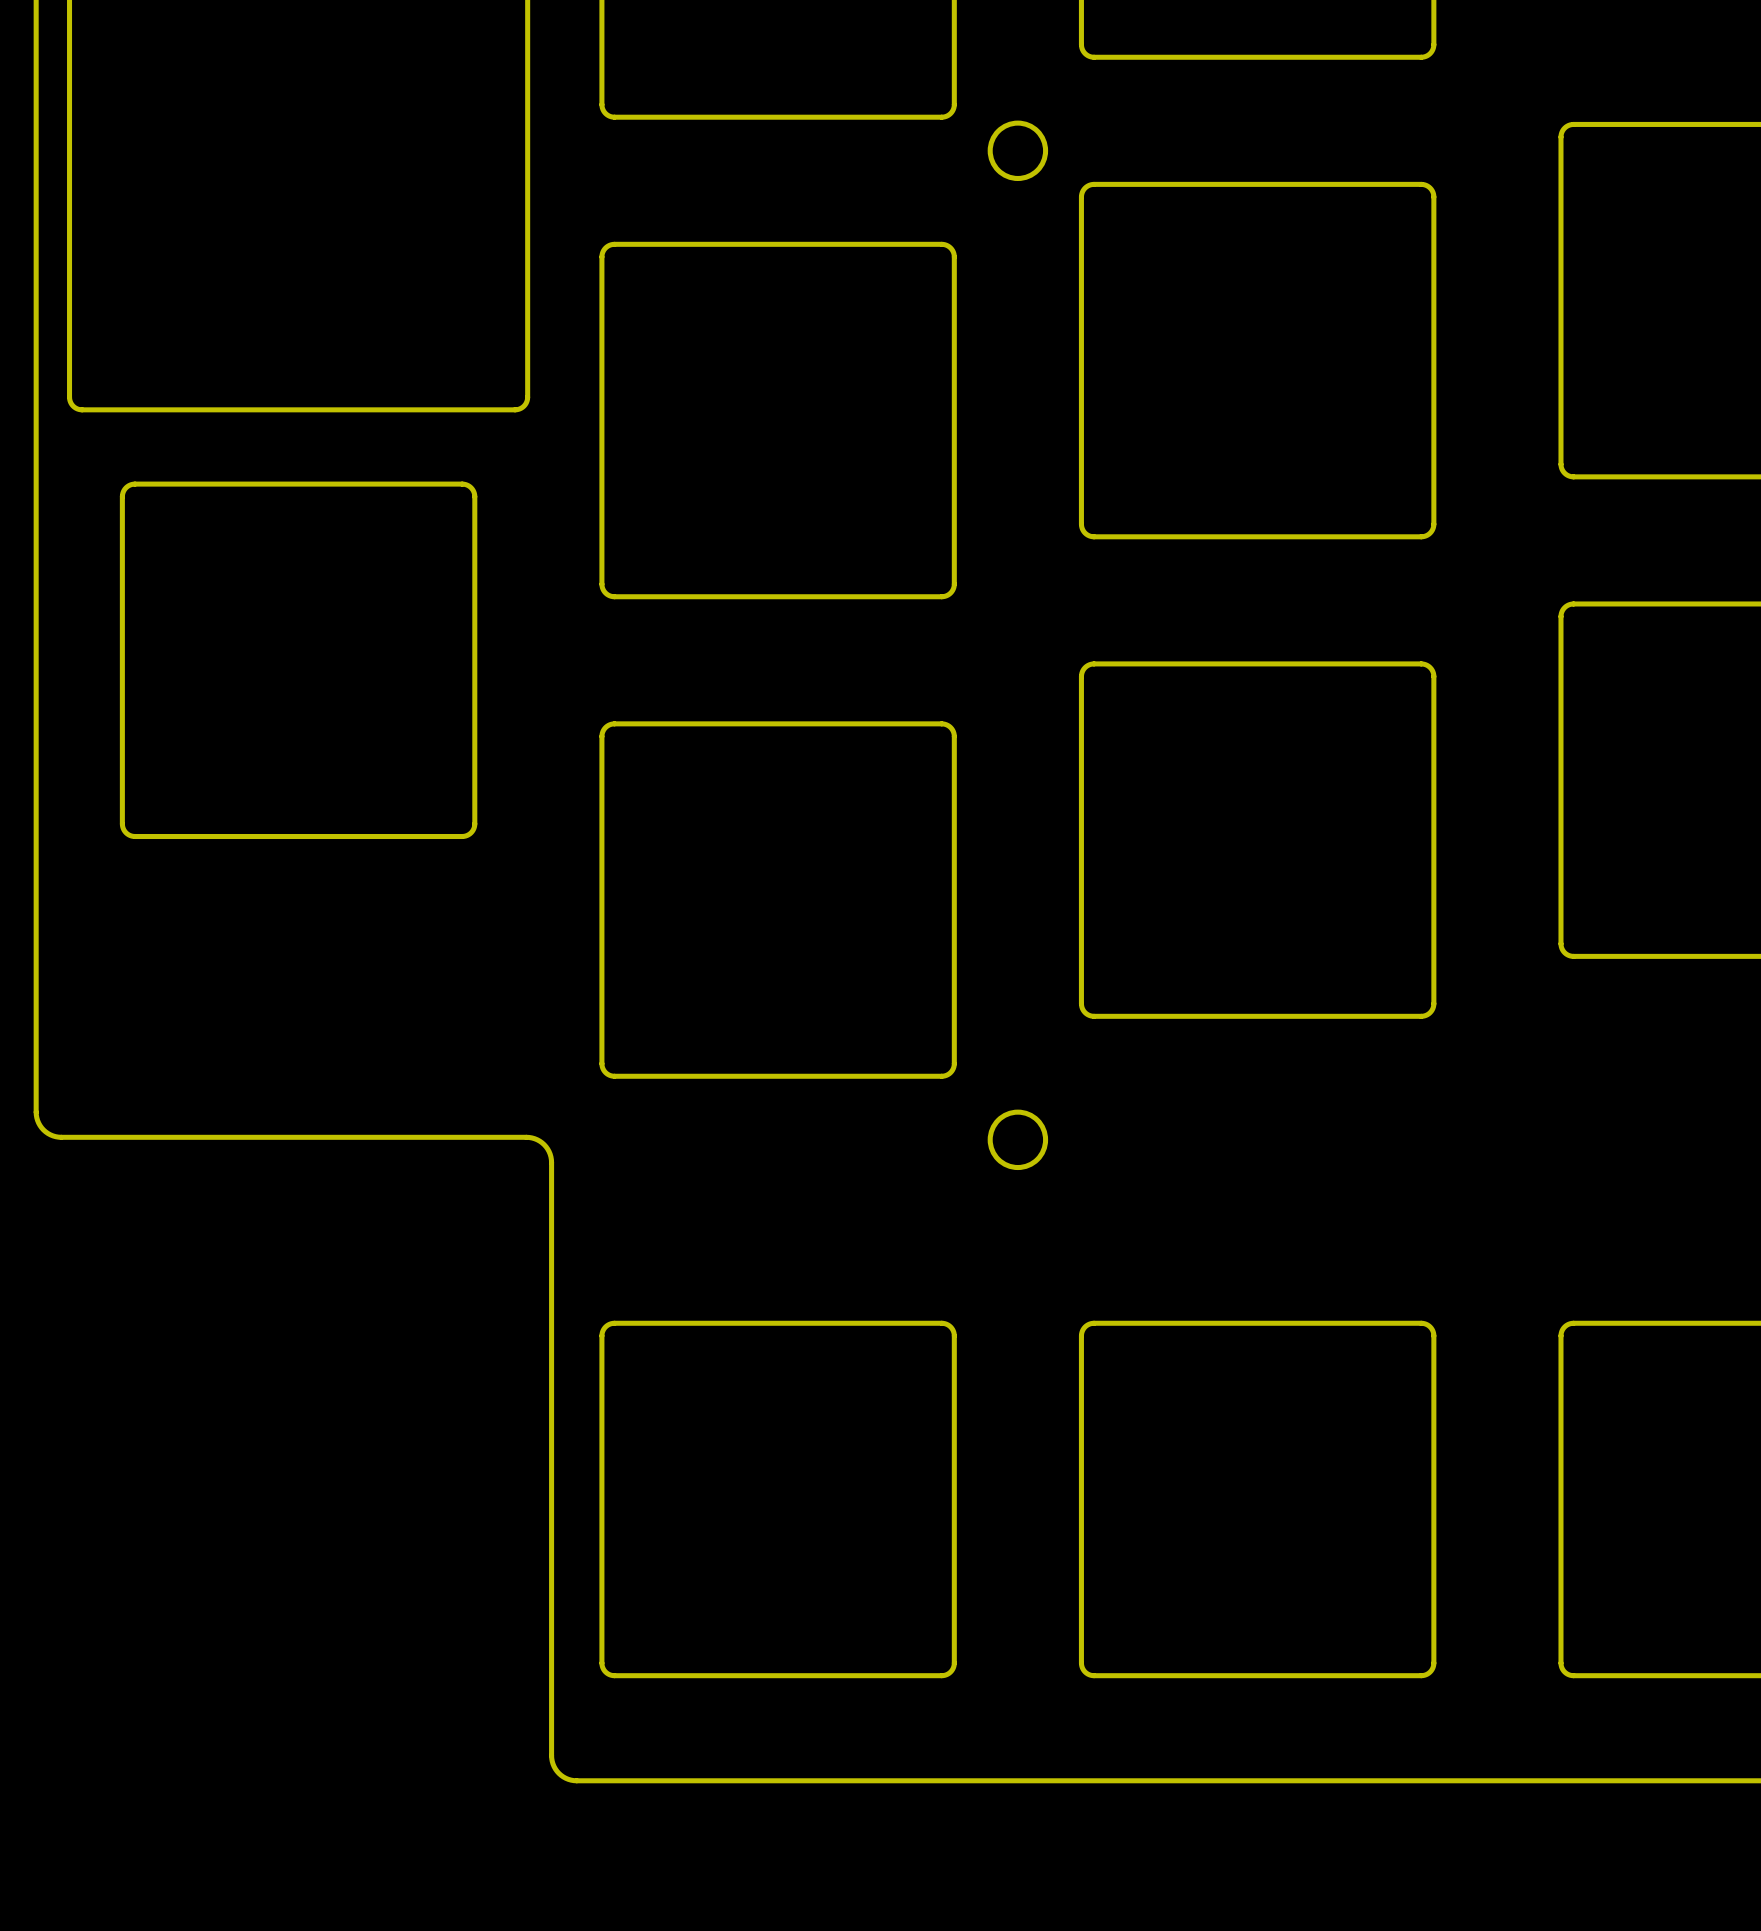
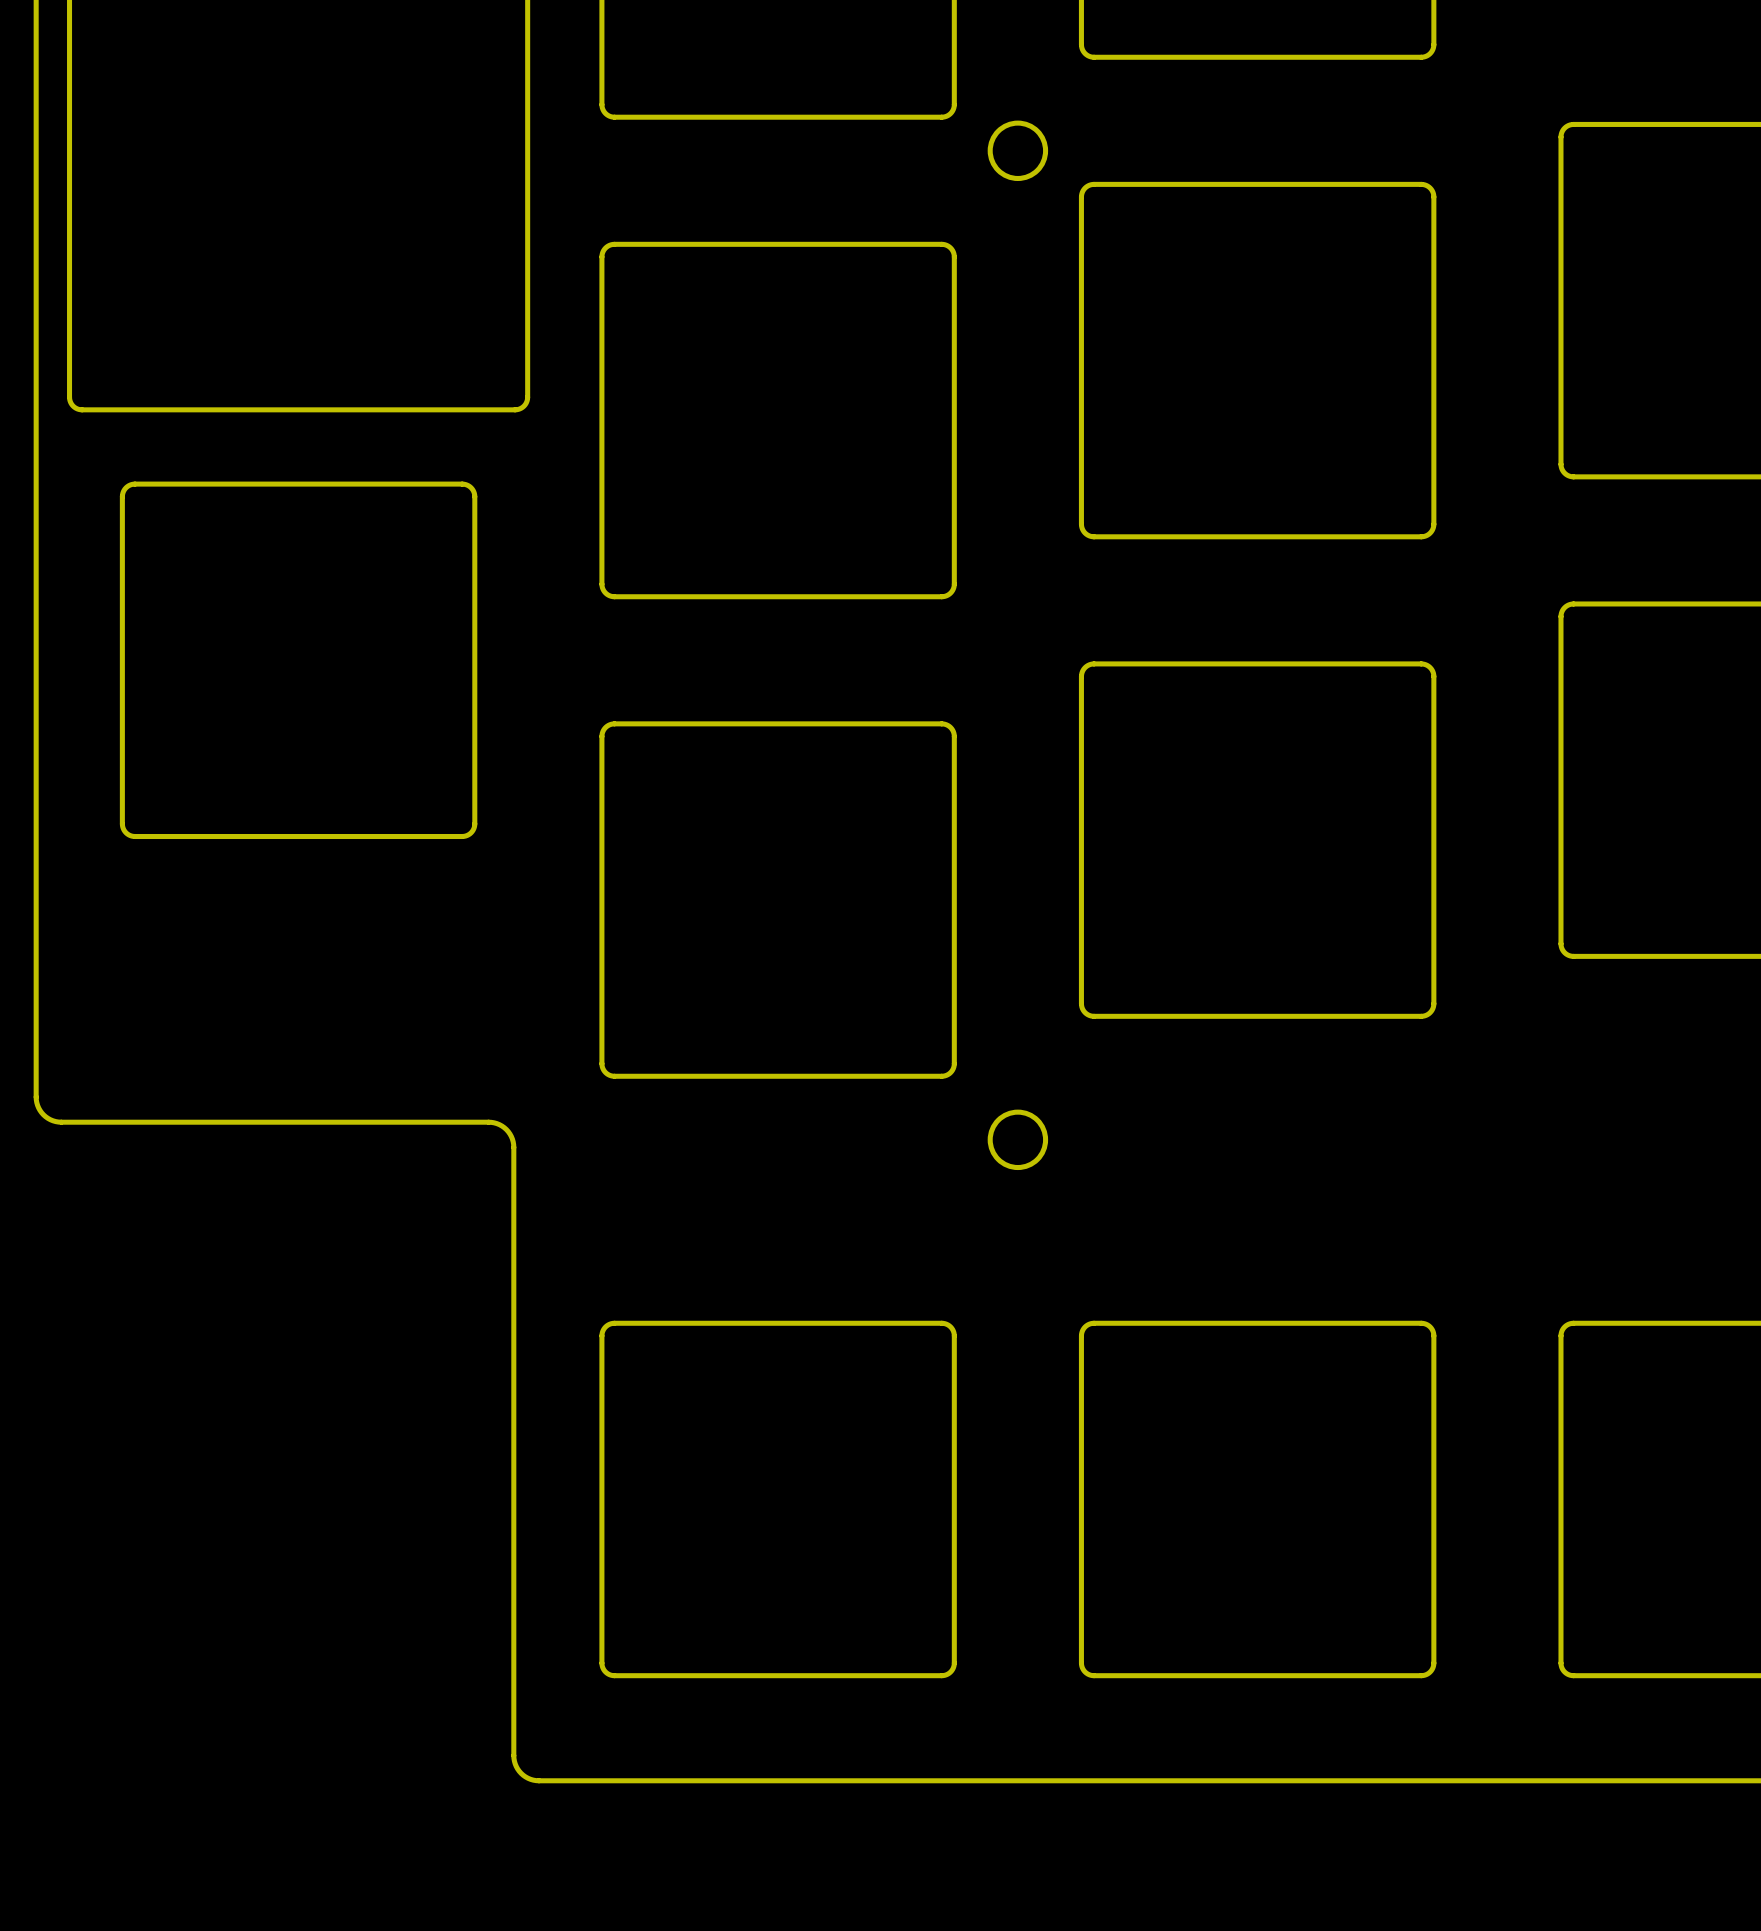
board edge: (36, 1097) (36, 1114) (40, 1125) (47, 1133) (58, 1137) (526, 1137) (537, 1139) (546, 1146) (551, 1162) (551, 1755) (554, 1766) (558, 1773) (565, 1778) (576, 1780) -> (36, 1097) (38, 1107) (43, 1114) (58, 1122) (488, 1122) (499, 1124) (508, 1131) (513, 1147) (513, 1758) (519, 1771) (530, 1779) (576, 1780)

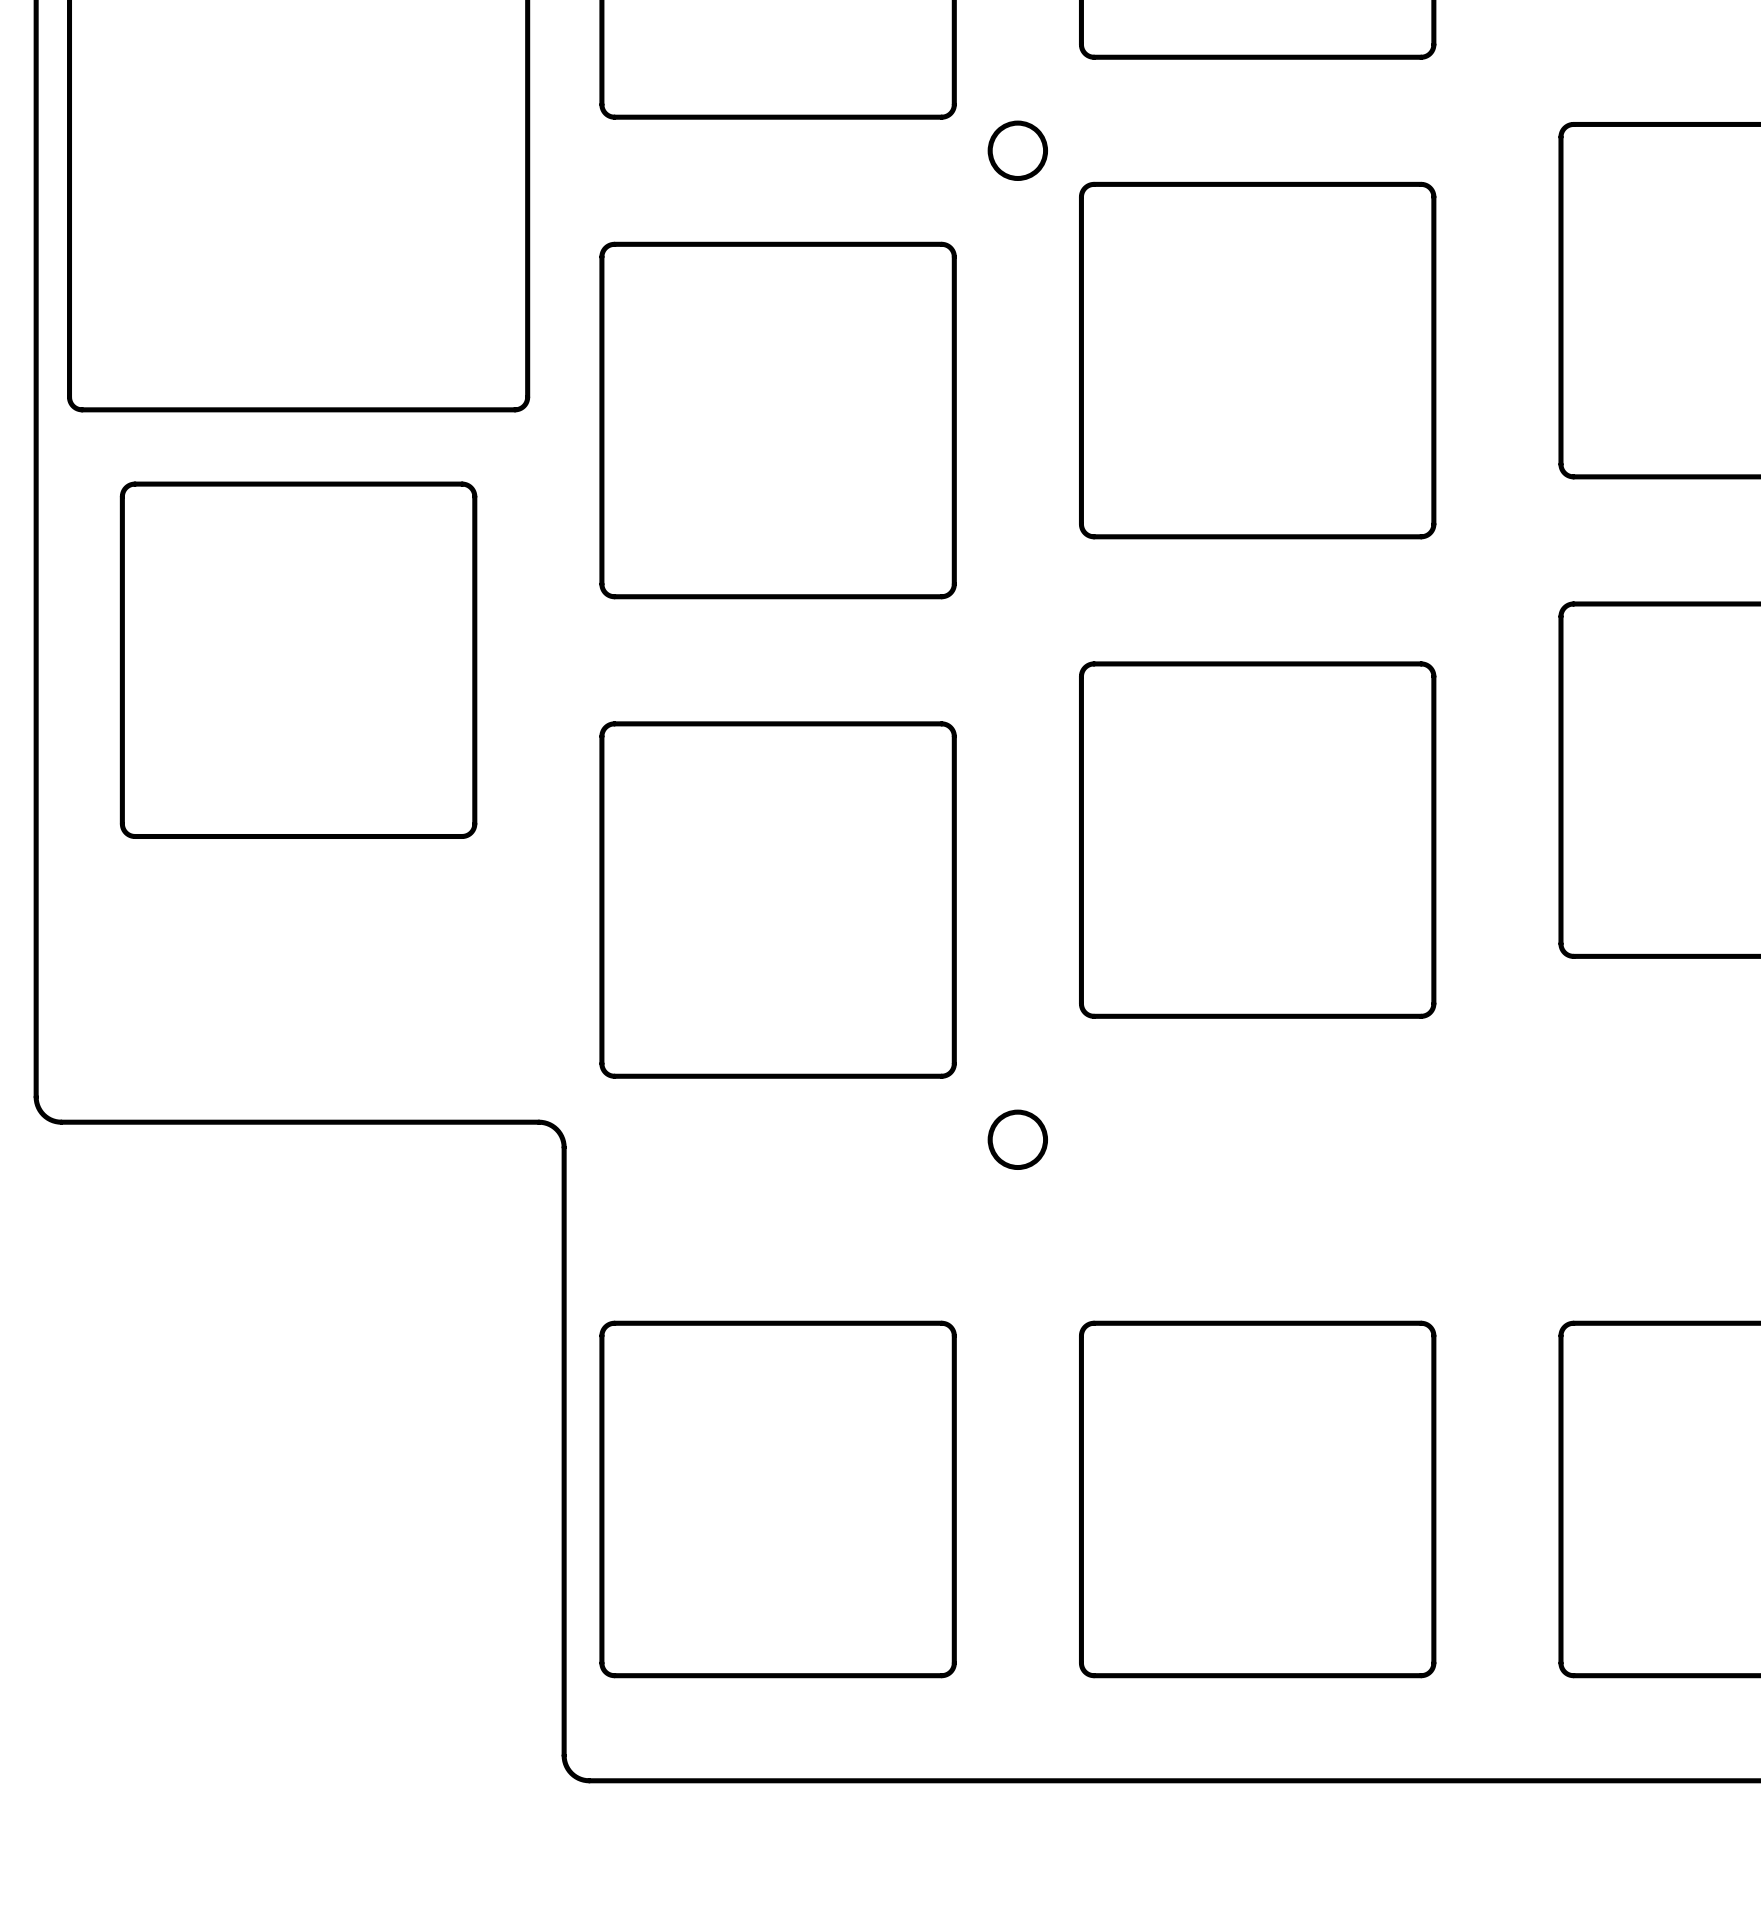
board edge: (488, 1122) (496, 1123) (506, 1129) (512, 1139) (513, 1147) (513, 1758) (519, 1771) (530, 1779) (589, 1780) -> (488, 1122) (547, 1123) (558, 1131) (563, 1144) (564, 1755) (565, 1763) (571, 1773) (578, 1778) (589, 1780)

